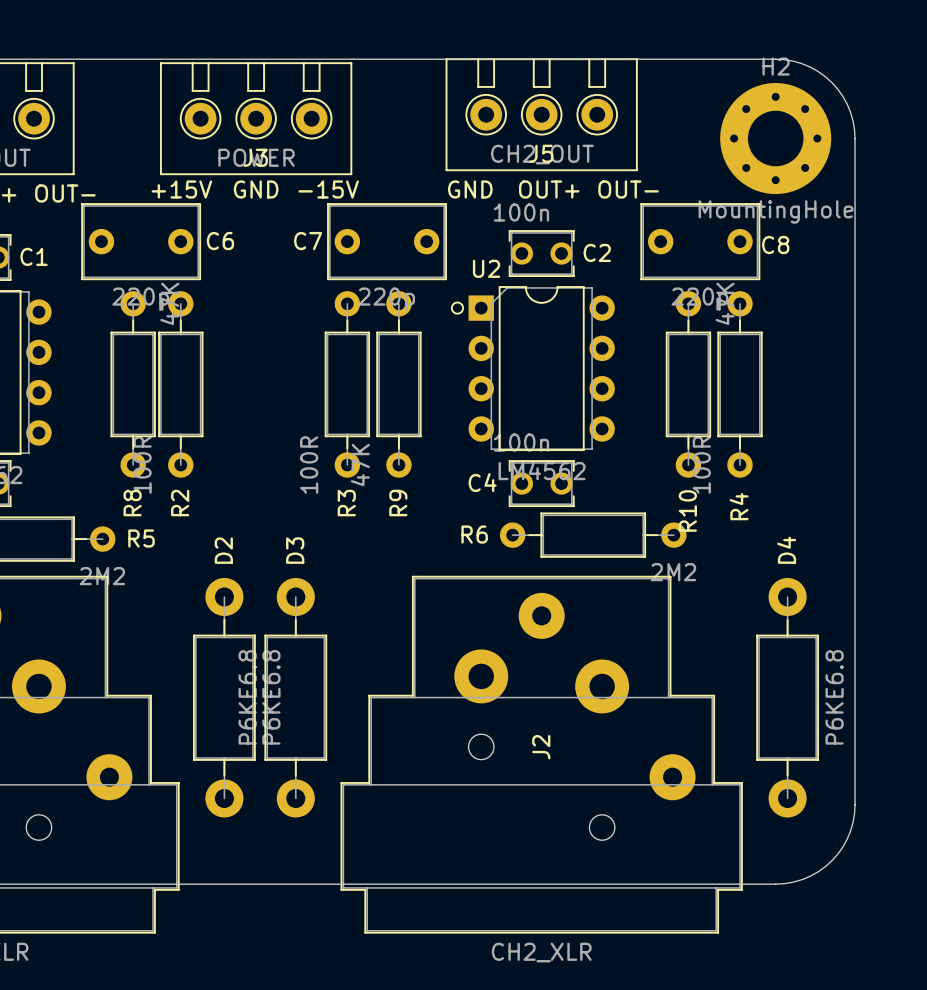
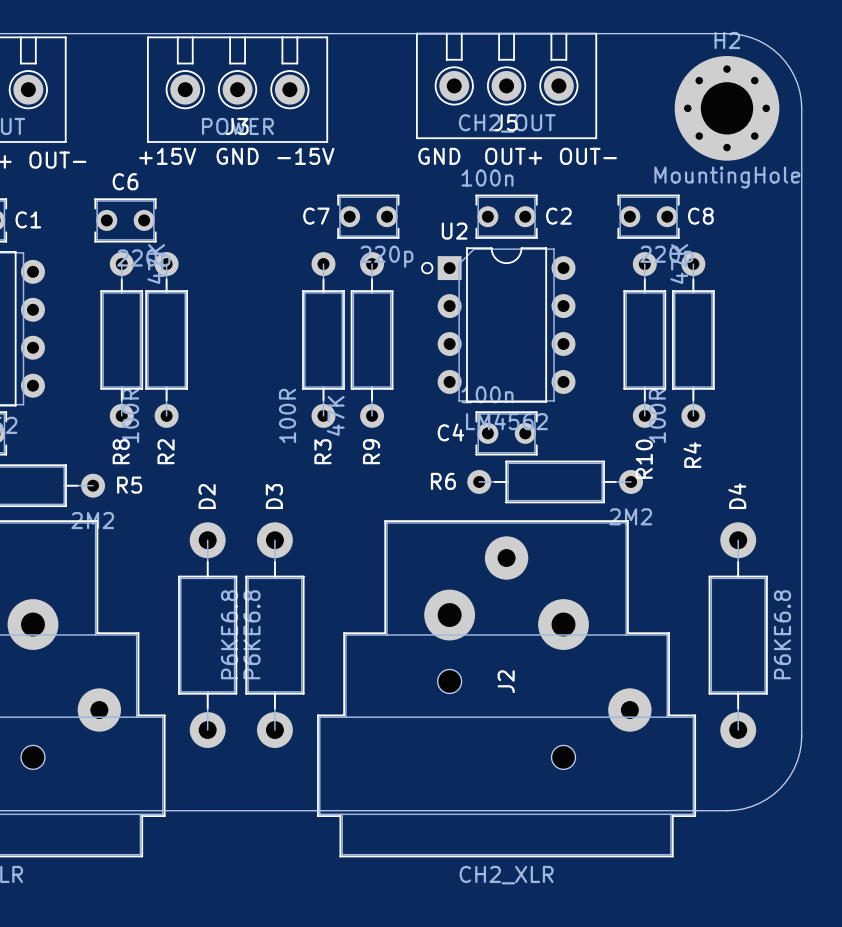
C6 footprint: [81, 203, 202, 281] -> [94, 198, 157, 243]
C7 footprint: [327, 203, 447, 281] -> [337, 194, 400, 239]
C8 footprint: [640, 203, 761, 281] -> [617, 194, 680, 239]
C6 name position: C6 (220, 241) -> C6 (125, 181)

